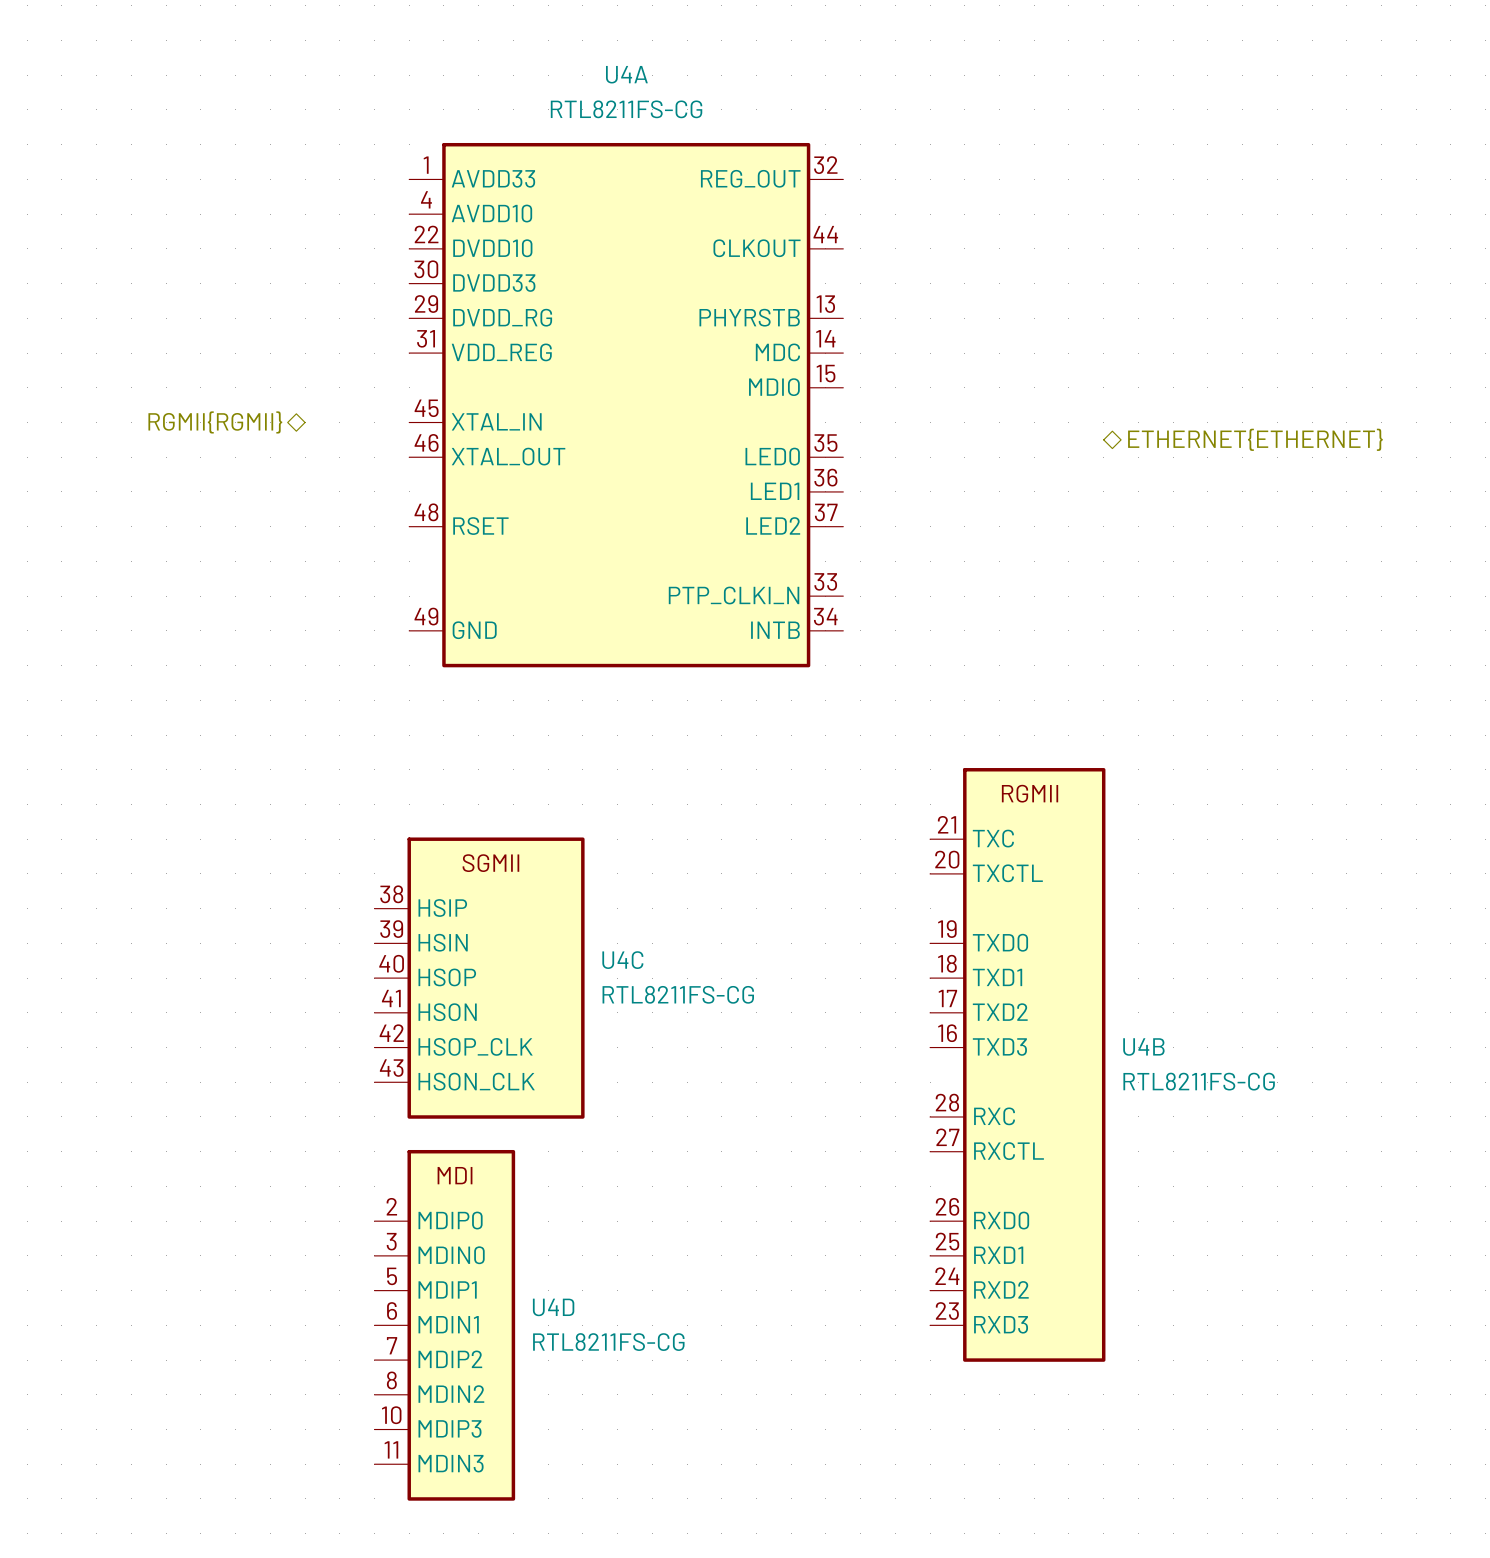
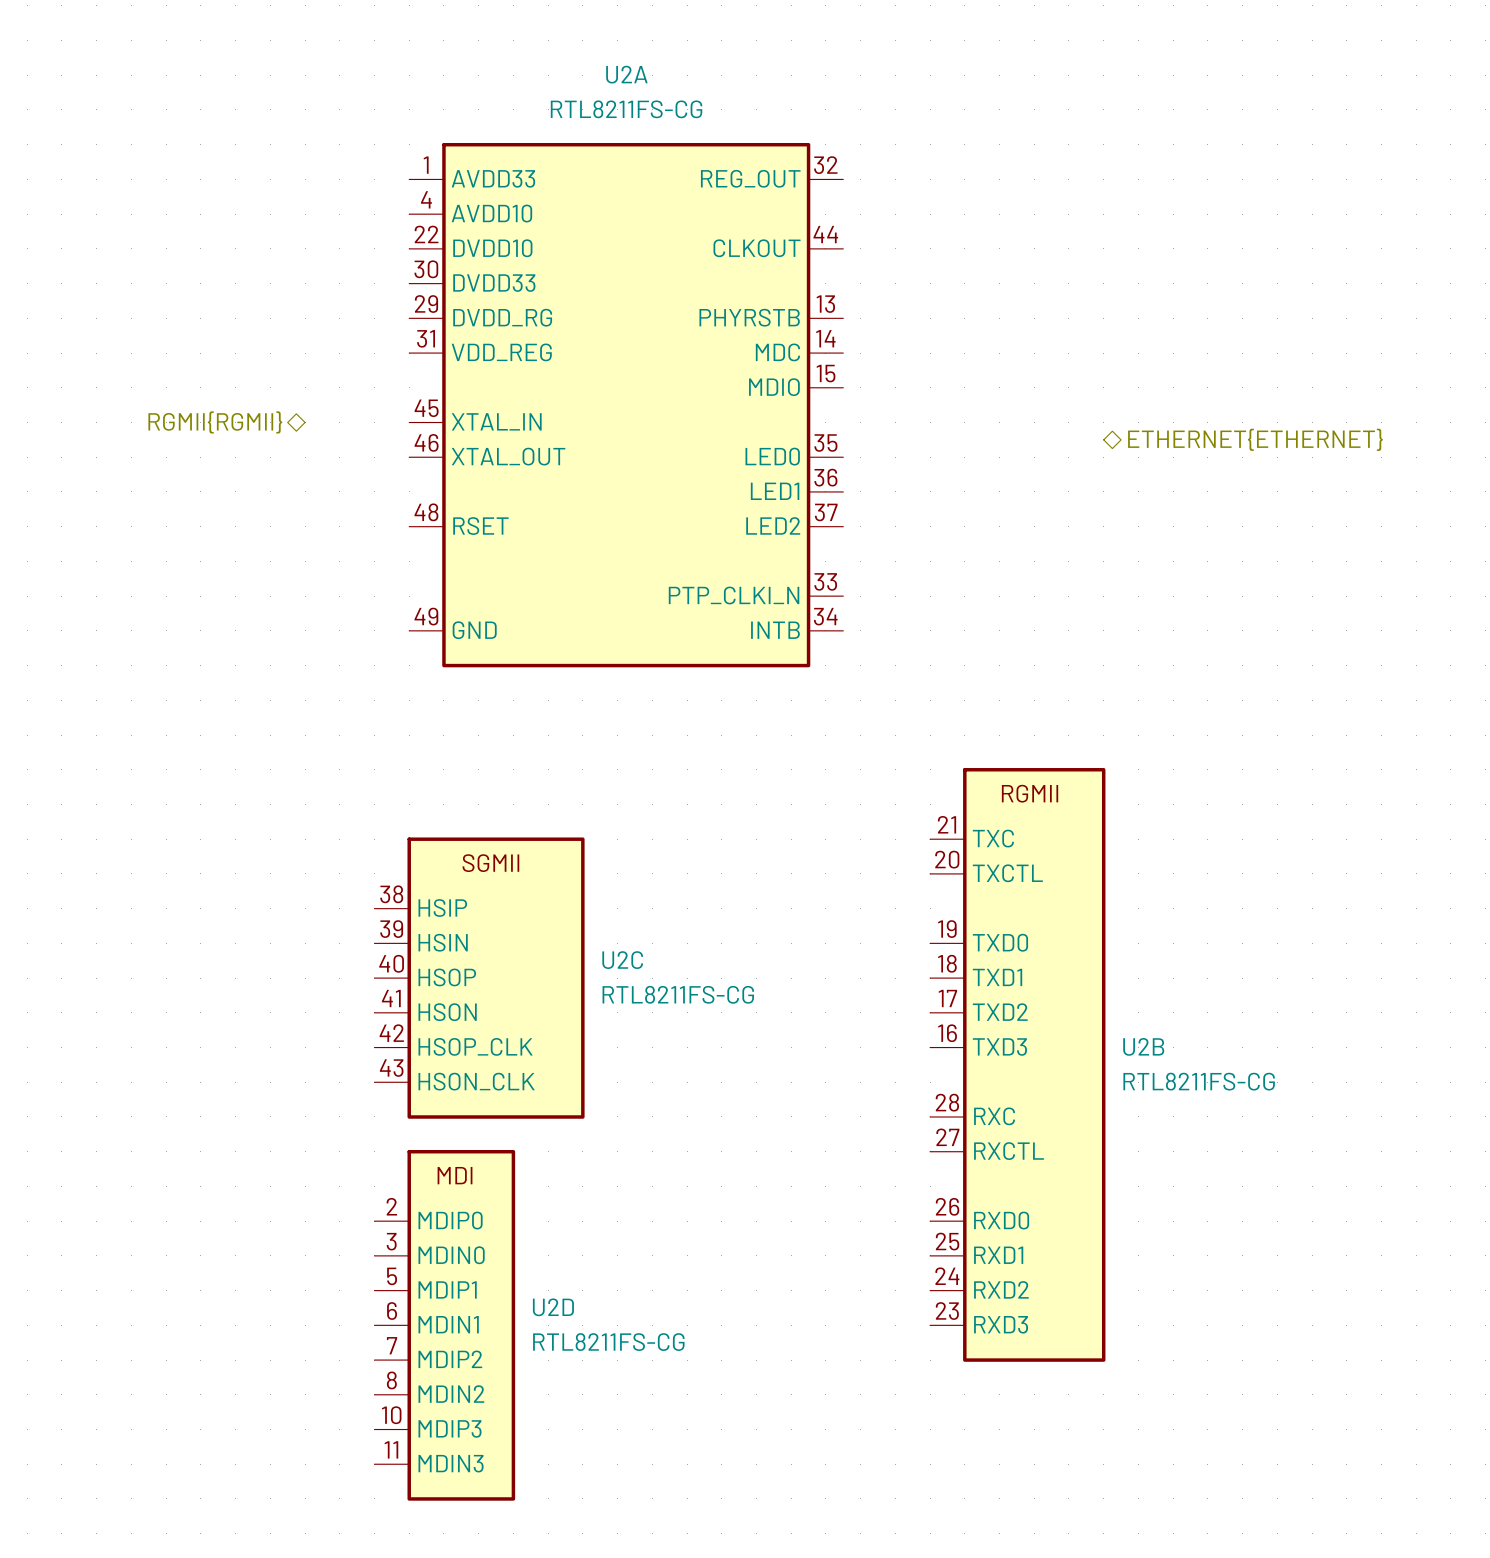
U4A name: U4A (626, 74) -> U2A (626, 74)
U4C name: U4C (622, 960) -> U2C (622, 960)
U4B name: U4B (1143, 1047) -> U2B (1143, 1046)
U4D name: U4D (553, 1307) -> U2D (553, 1307)

